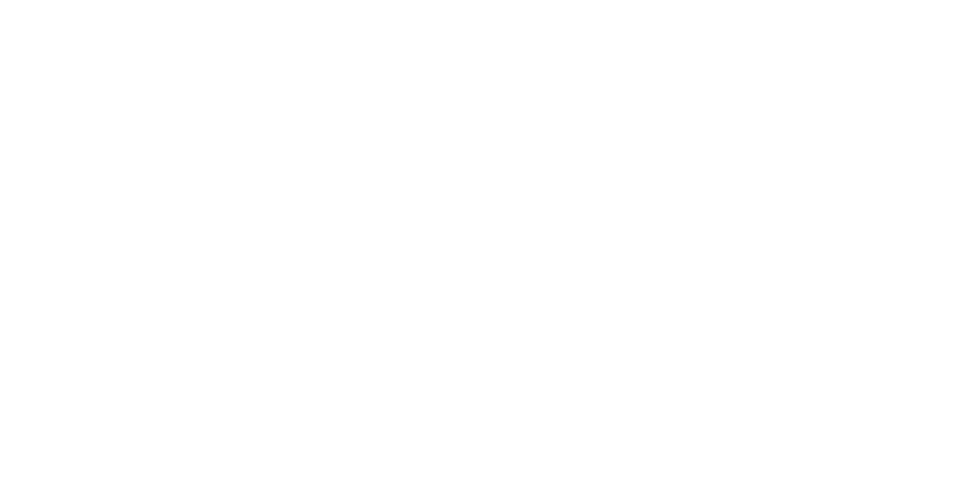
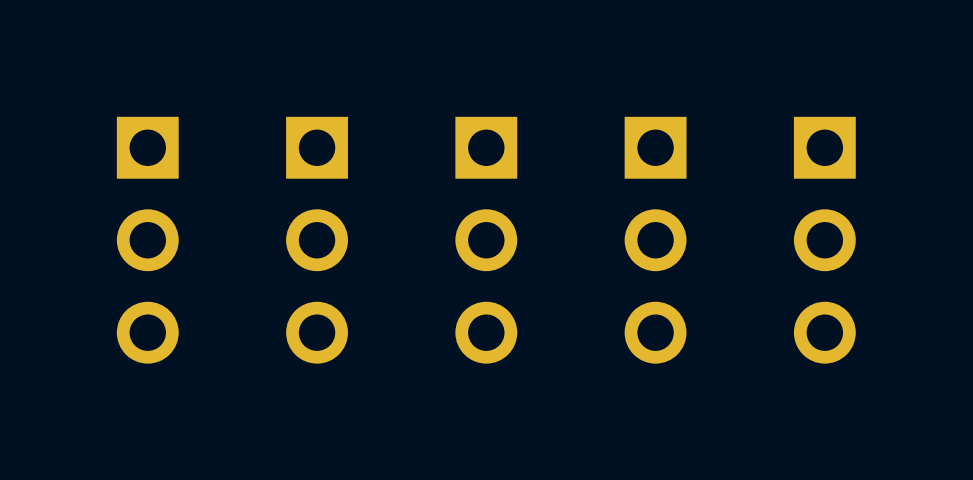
part: none -> (147, 240)
part: none -> (317, 240)
part: none -> (486, 240)
part: none -> (655, 240)
part: none -> (824, 240)

